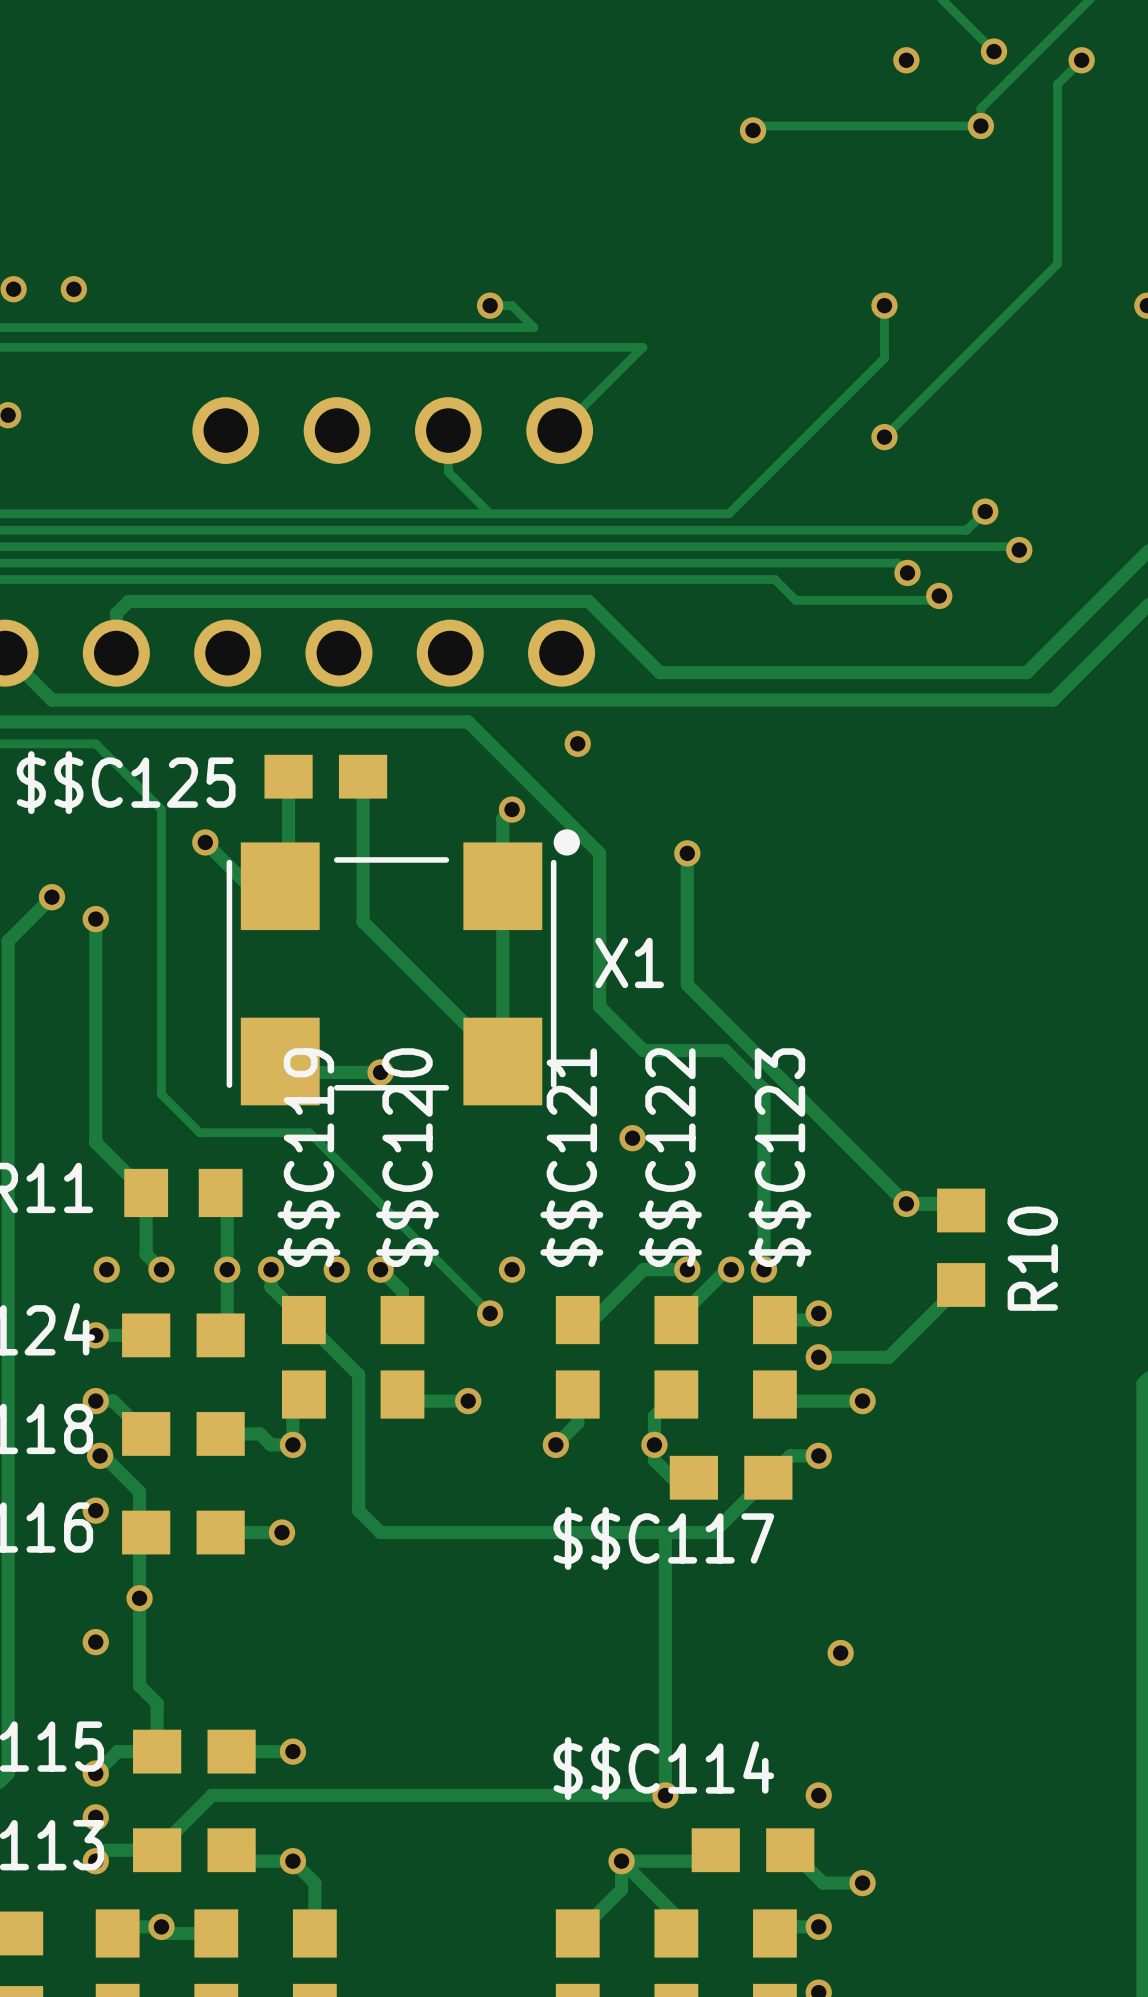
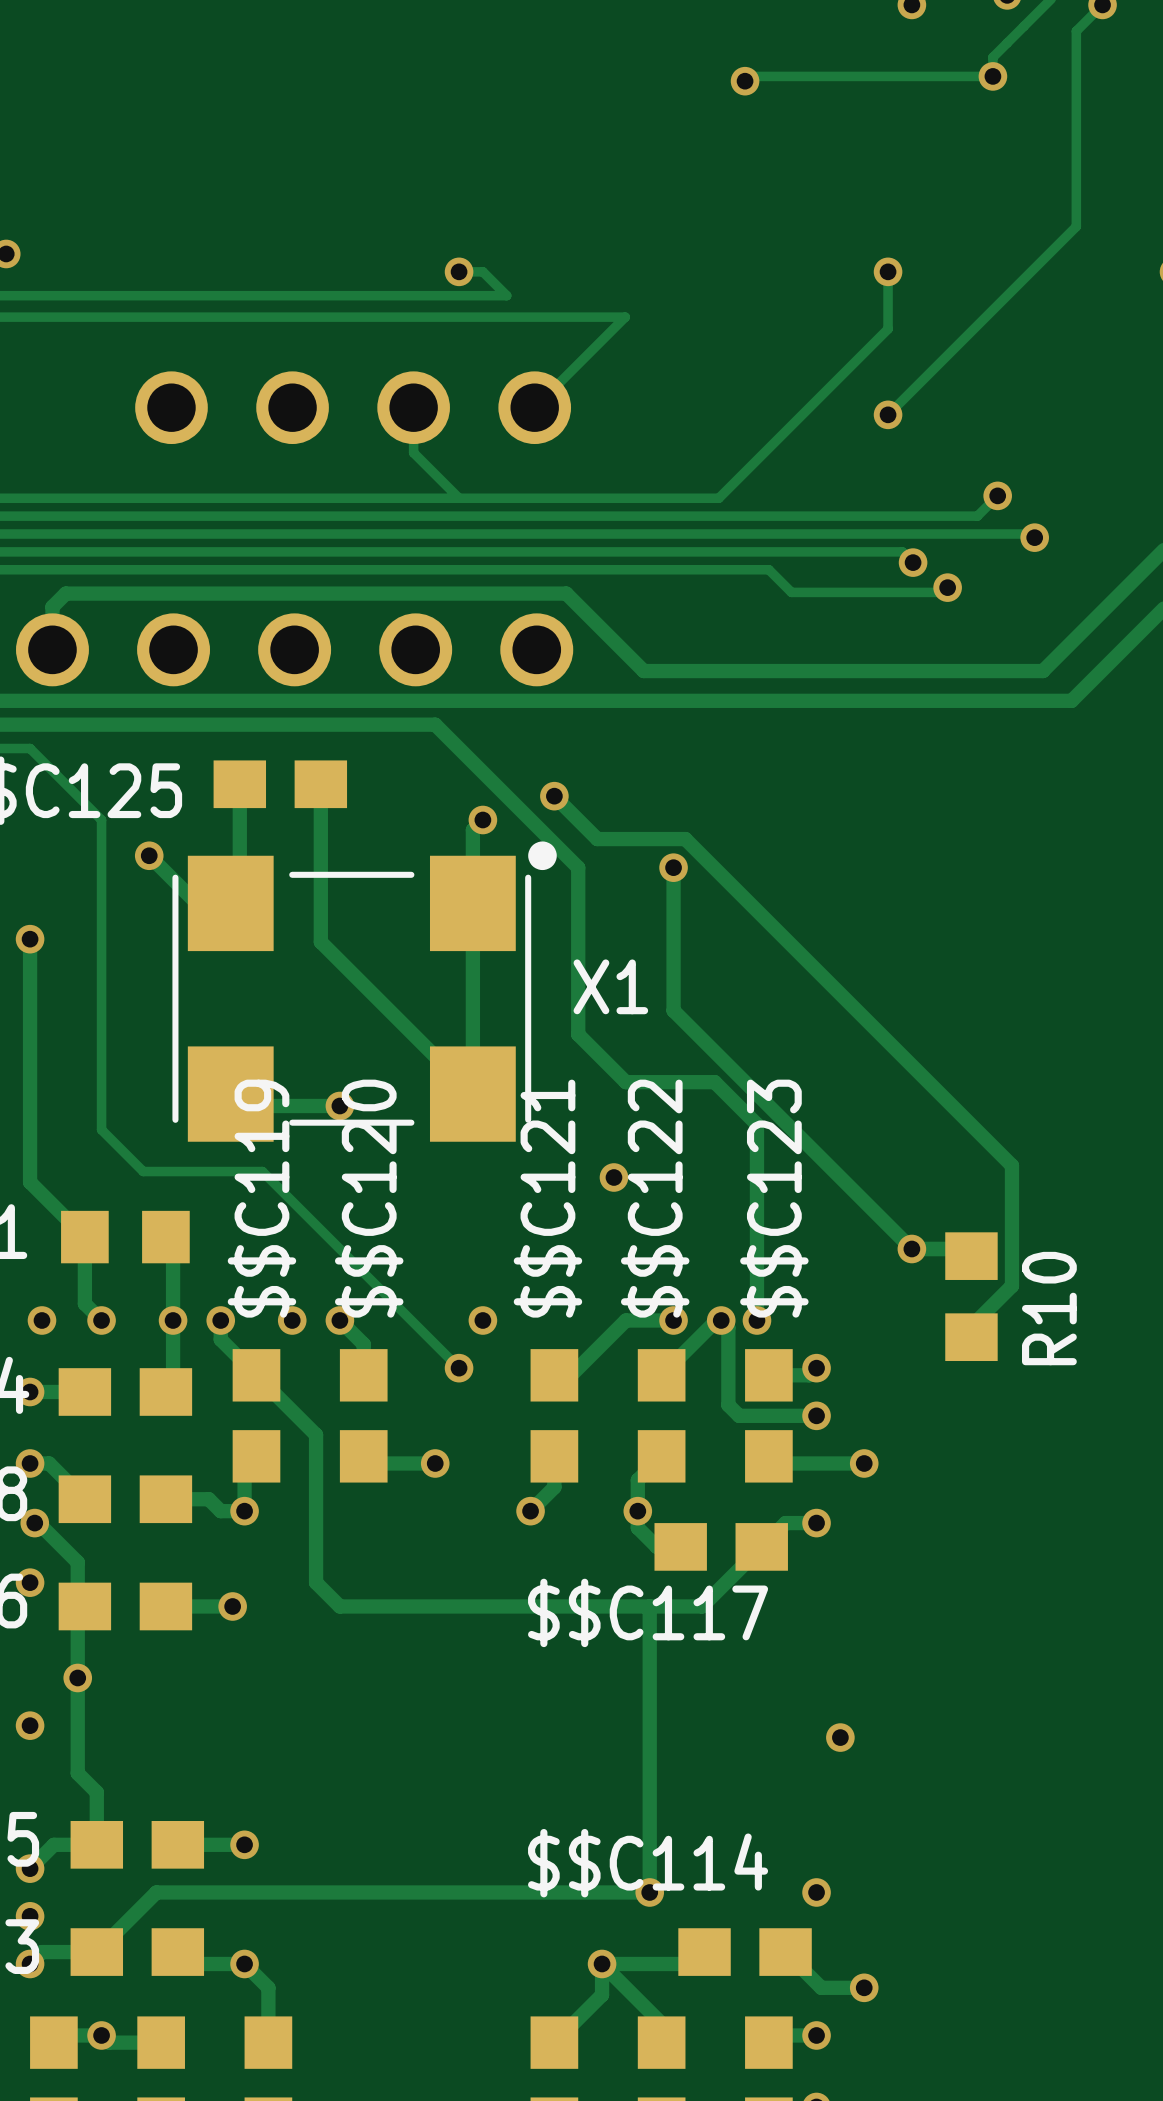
via position: (577, 743) -> (554, 796)
track: none -> (554, 796) (597, 839) (685, 839) (1011, 1165) (1011, 1285) (971, 1326) (971, 1337)
track: (961, 1284) (888, 1357) (818, 1357) -> (721, 1320) (728, 1327) (728, 1405) (739, 1415) (816, 1415)

